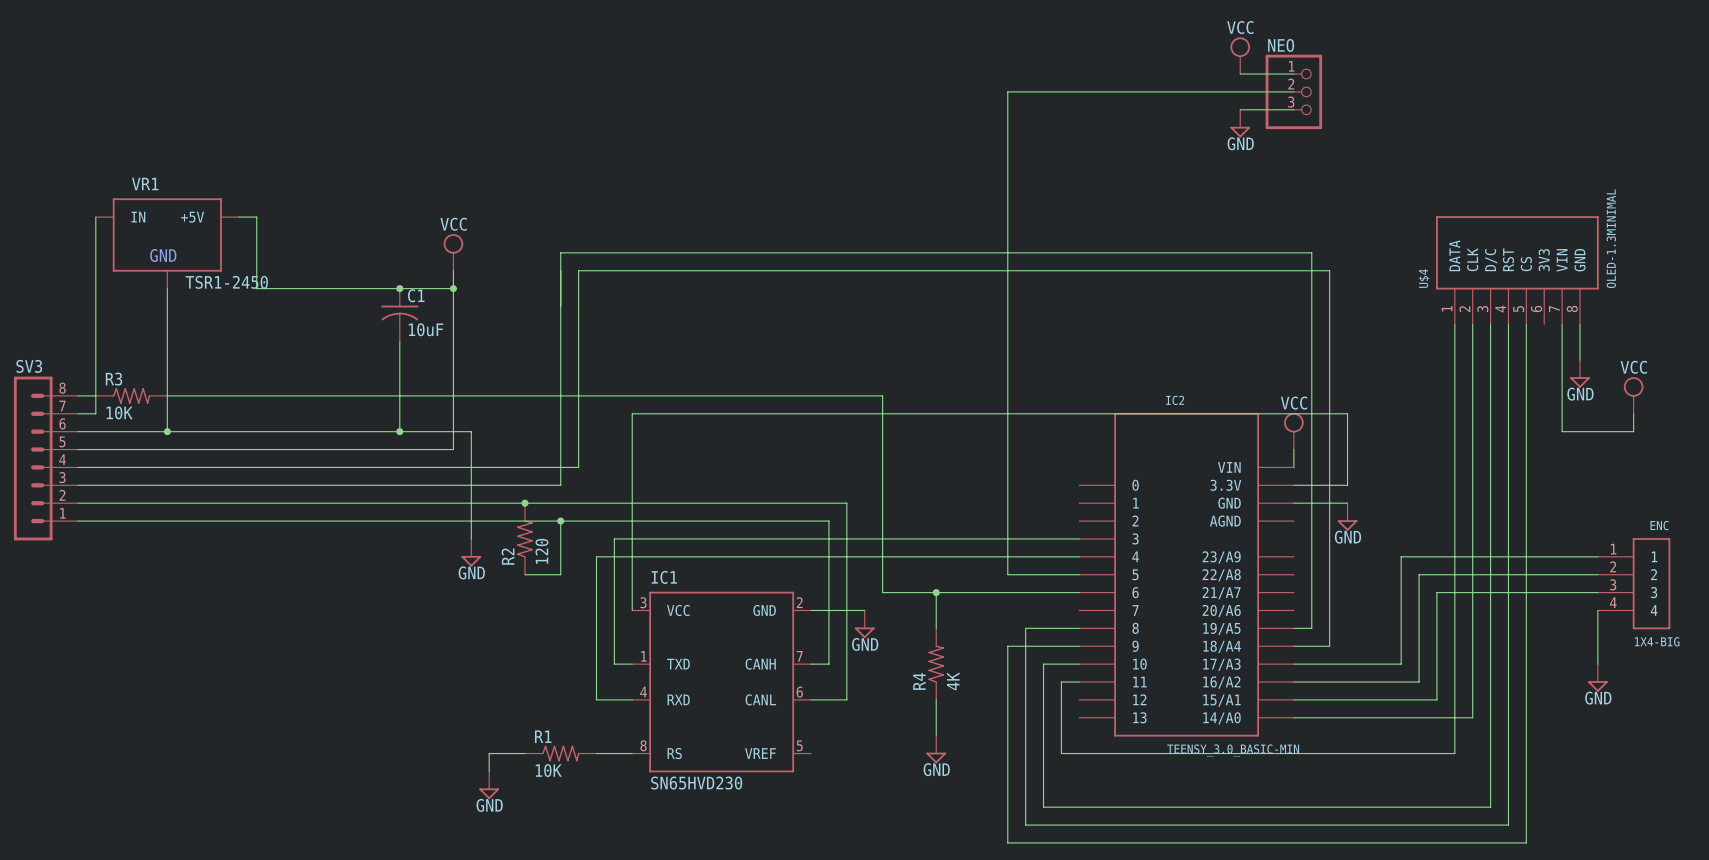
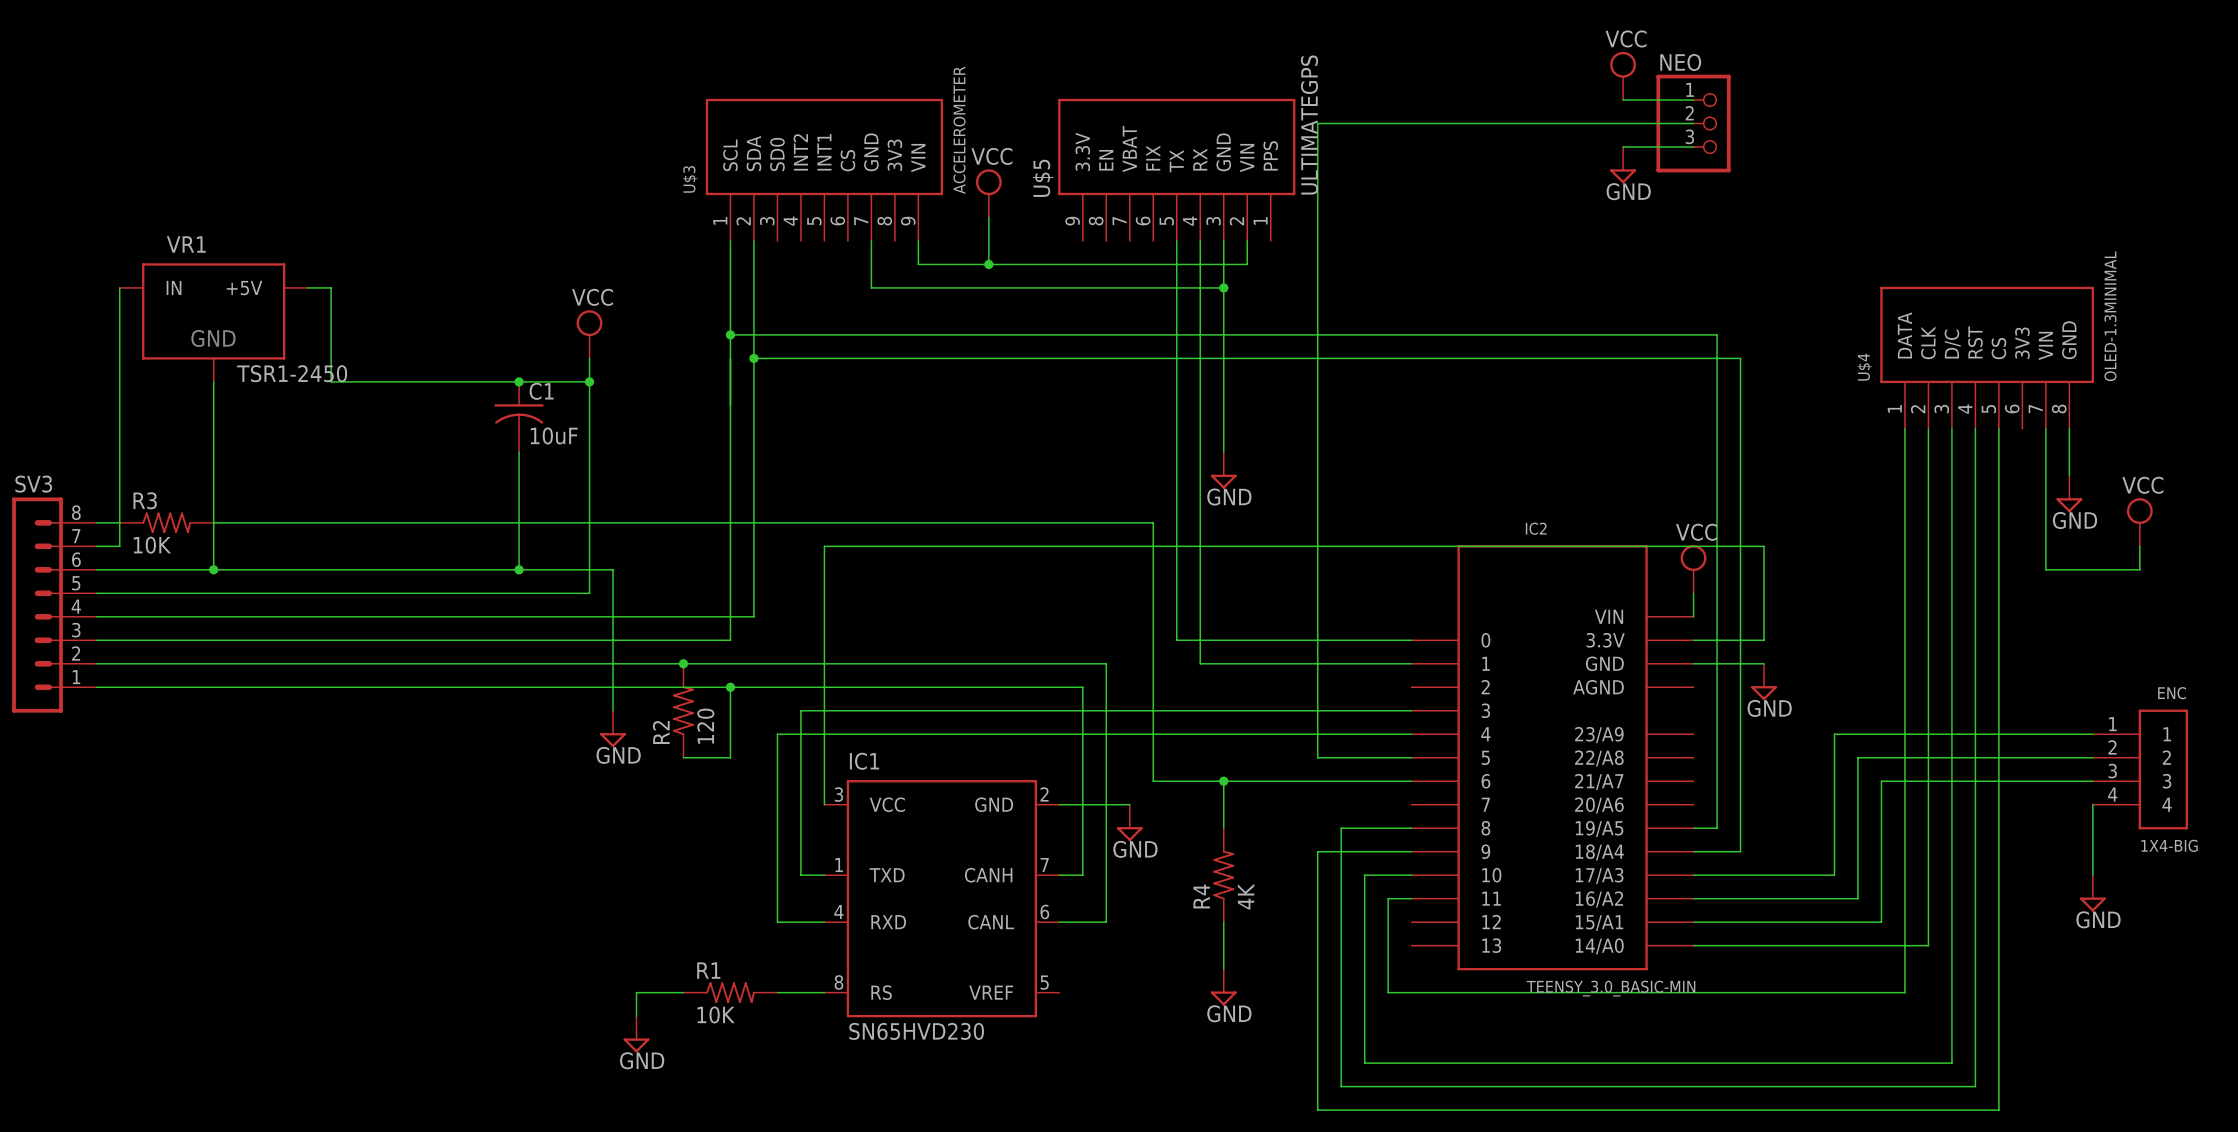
U$3: none -> ACCELEROMETER (824, 169)
U$5: none -> ULTIMATEGPS (1176, 169)
power symbol: none -> VCC (988, 193)
wire: none -> (988, 217) (988, 264)
wire: none -> (730, 240) (730, 334)
wire: none -> (753, 240) (753, 358)
wire: none -> (871, 240) (871, 287) (1223, 287)
wire: none -> (918, 240) (918, 264) (1247, 264) (1247, 240)
wire: none -> (1176, 240) (1176, 640) (1411, 640)
wire: none -> (1200, 240) (1200, 663) (1411, 663)
wire: none -> (1223, 240) (1223, 452)
junction: none -> (988, 264)
junction: none -> (1223, 287)
junction: none -> (730, 334)
junction: none -> (753, 358)
power symbol: none -> GND (1223, 470)

